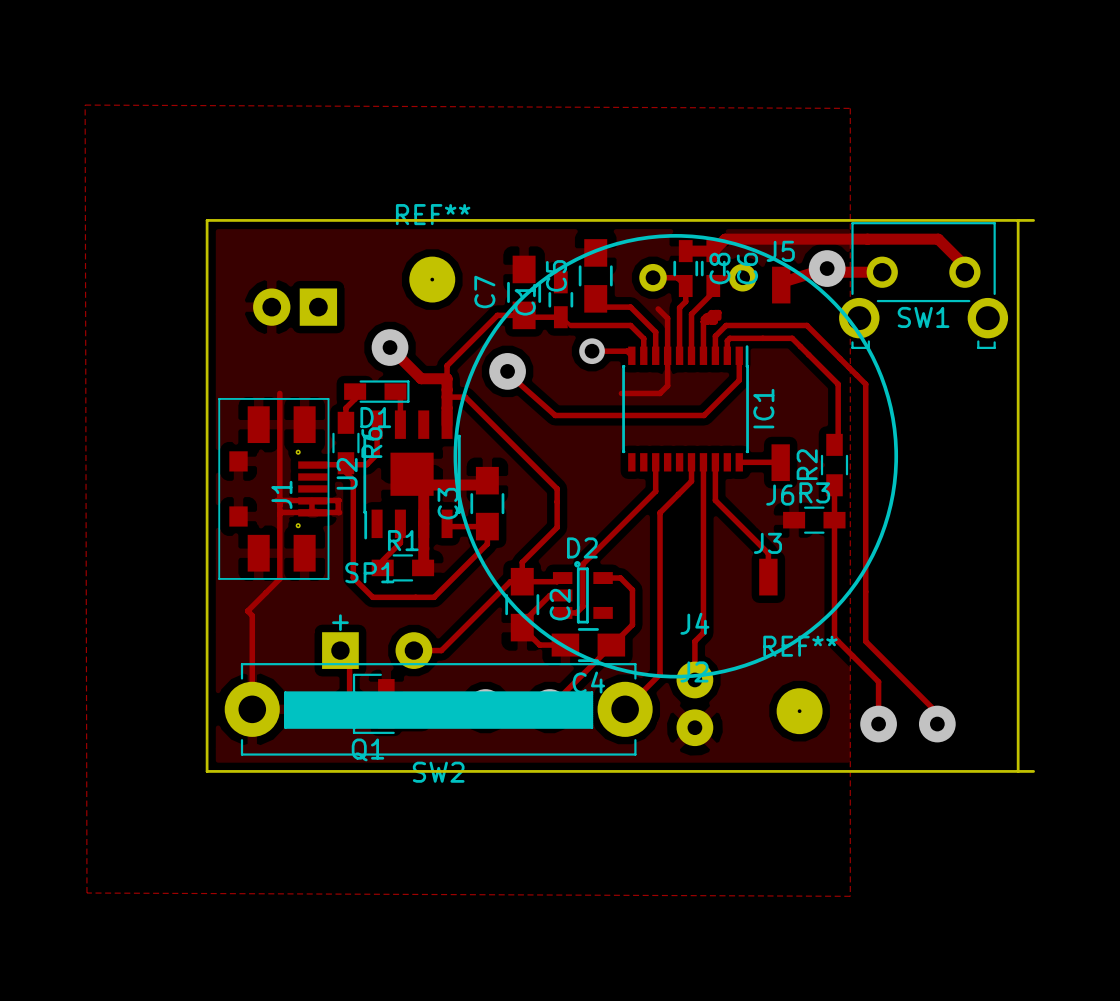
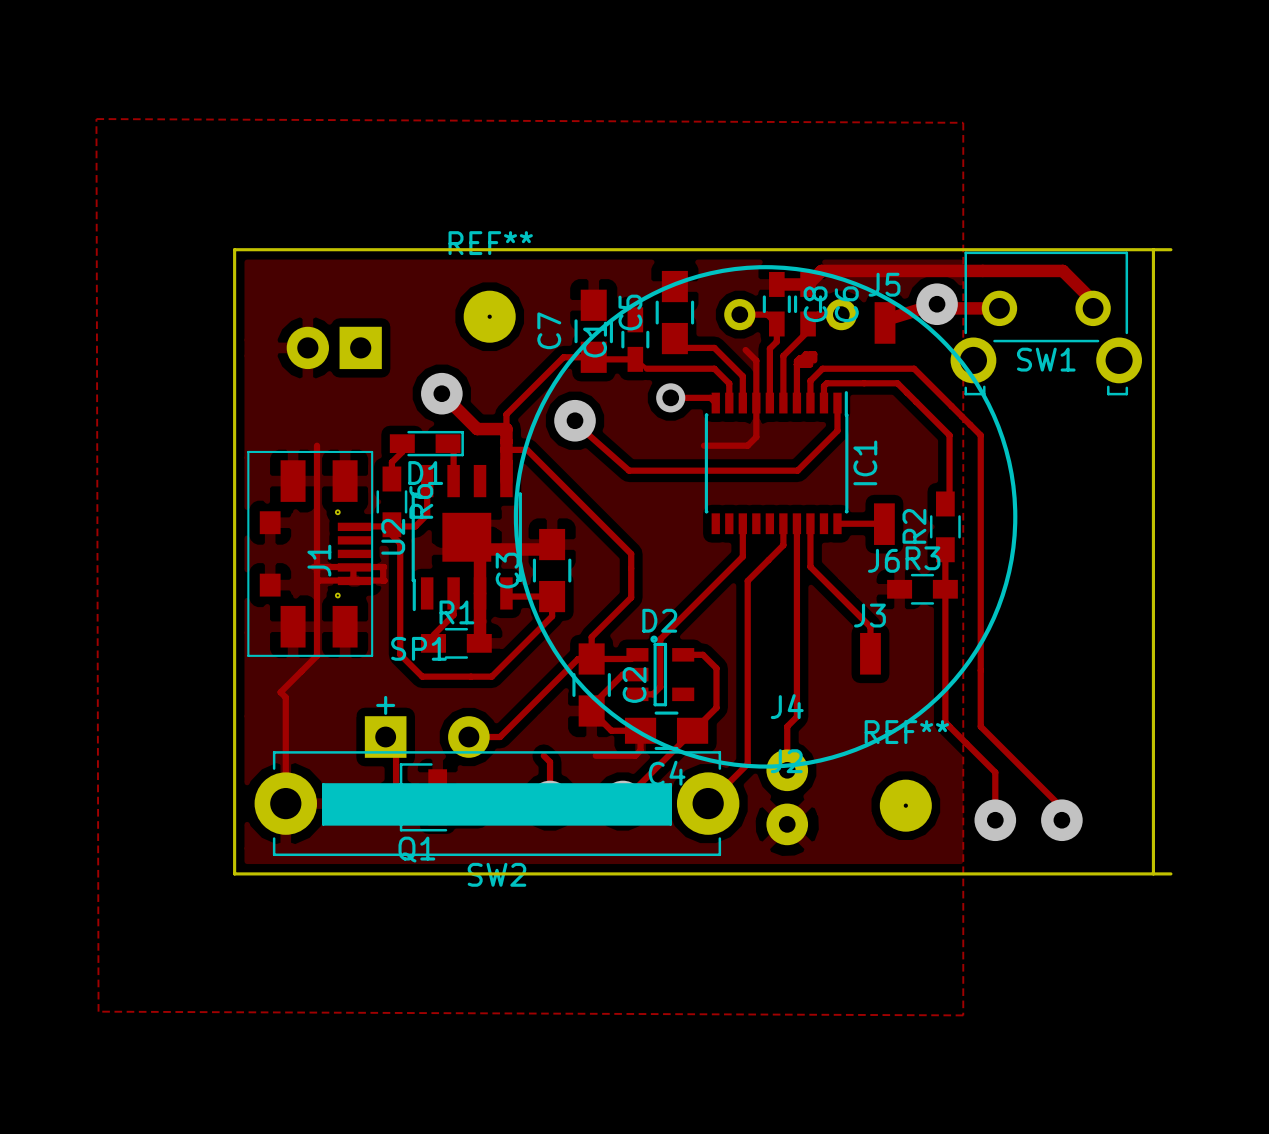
track: none -> (640, 730) (640, 750) (635, 755) (595, 755)
track: none -> (543, 755) (550, 761) (550, 801)

